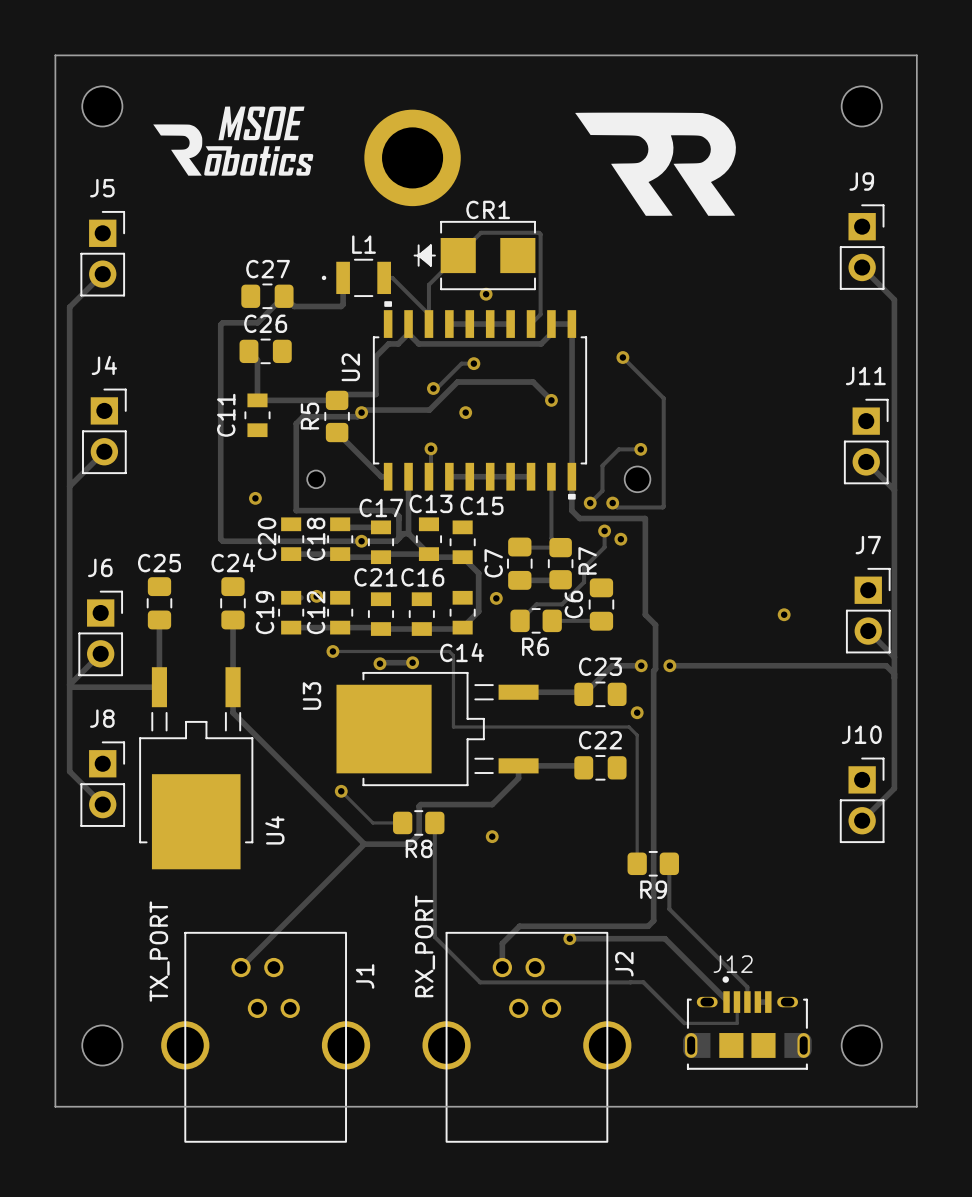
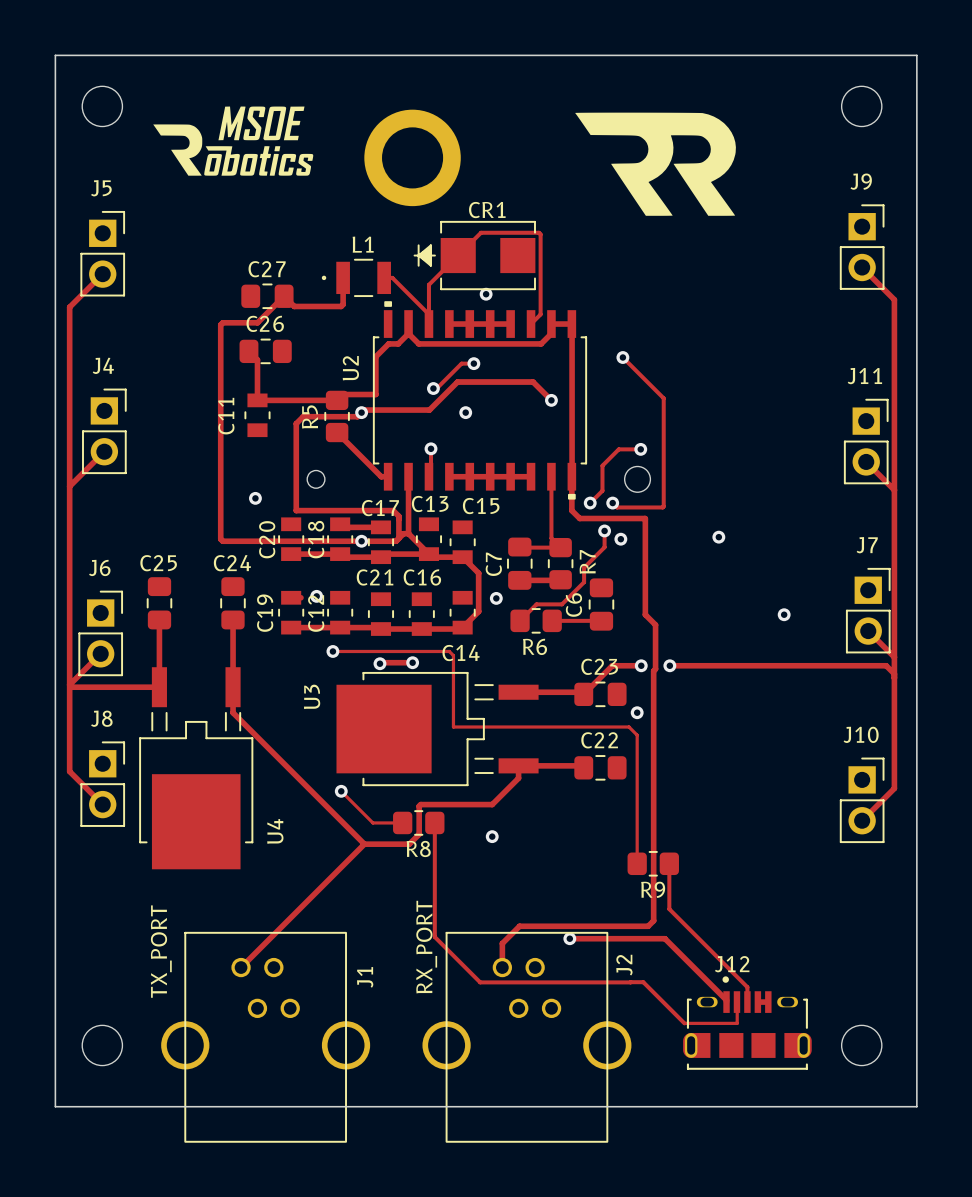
via: none -> (718, 537)

